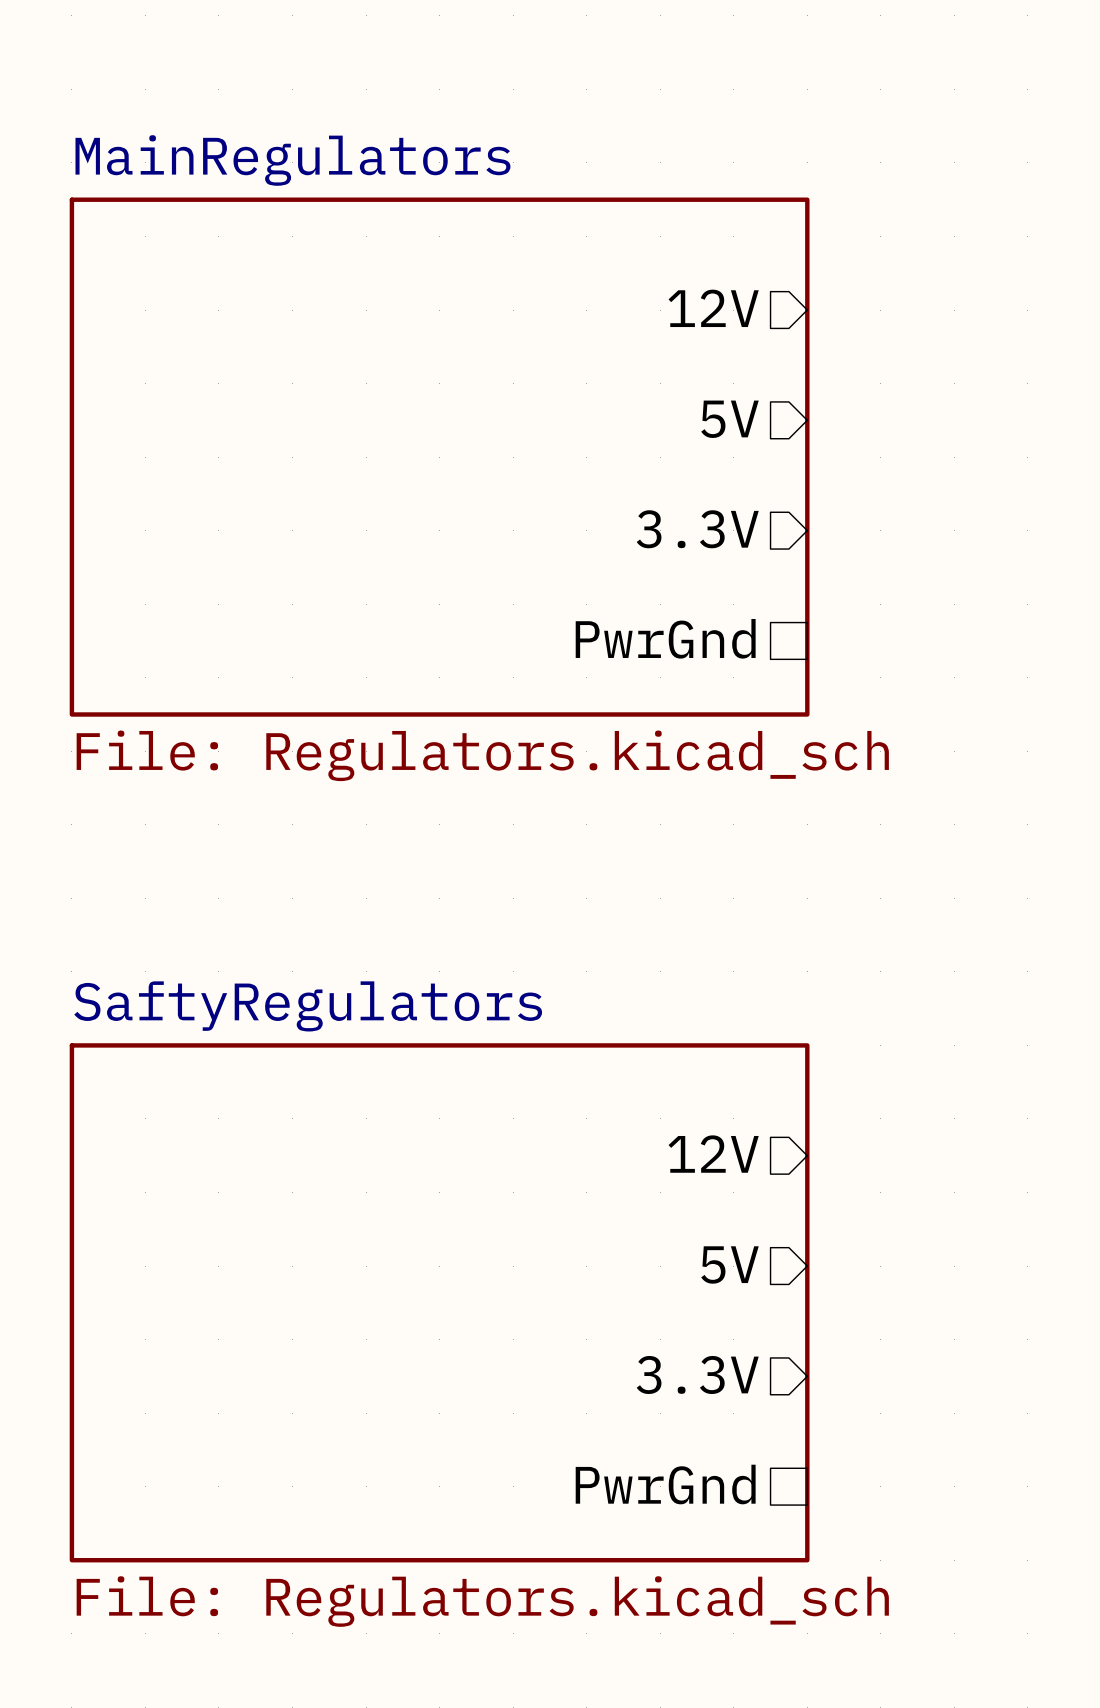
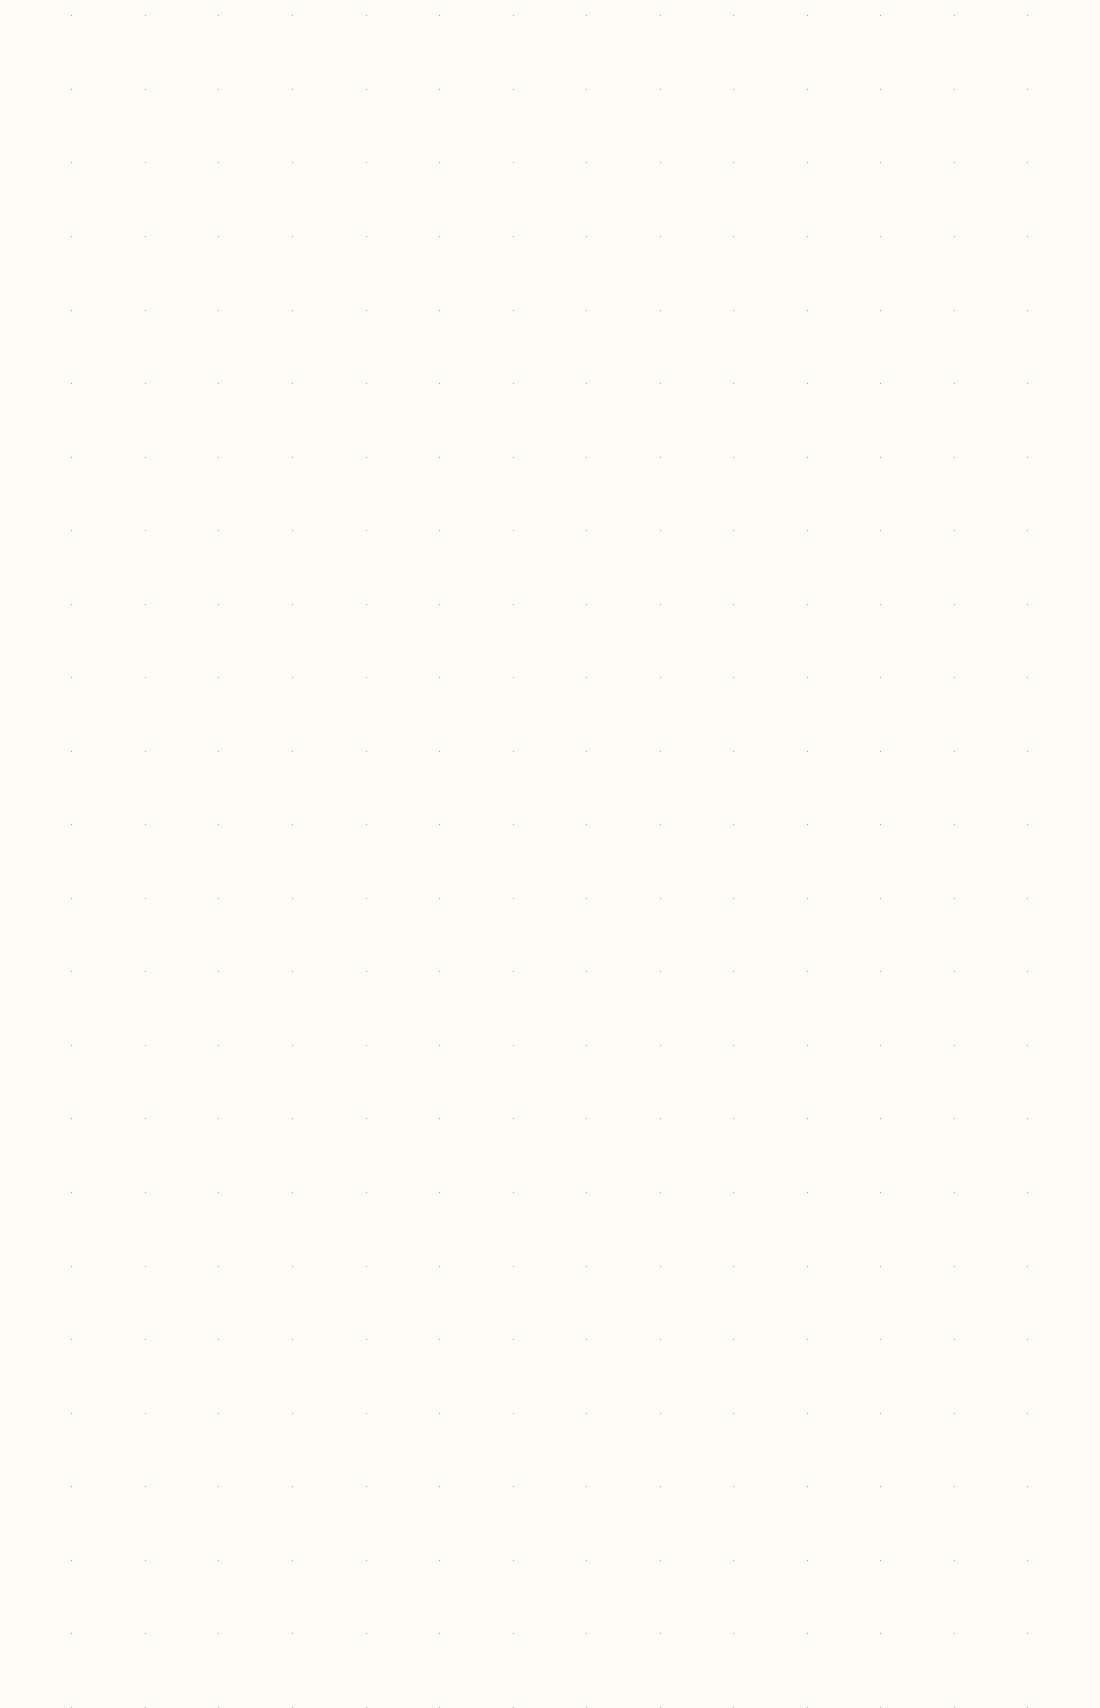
sheet pin: 12V (713, 308) -> none
sheet pin: 5V (729, 419) -> none
sheet MainRegulators: File: Regulators.kicad_sch (439, 457) -> none
sheet pin: 3.3V (697, 529) -> none
sheet pin: PwrGnd (665, 638) -> none
sheet pin: 12V (713, 1154) -> none
sheet pin: 5V (729, 1264) -> none
sheet SaftyRegulators: File: Regulators.kicad_sch (439, 1302) -> none
sheet pin: 3.3V (697, 1374) -> none
sheet pin: PwrGnd (665, 1484) -> none

